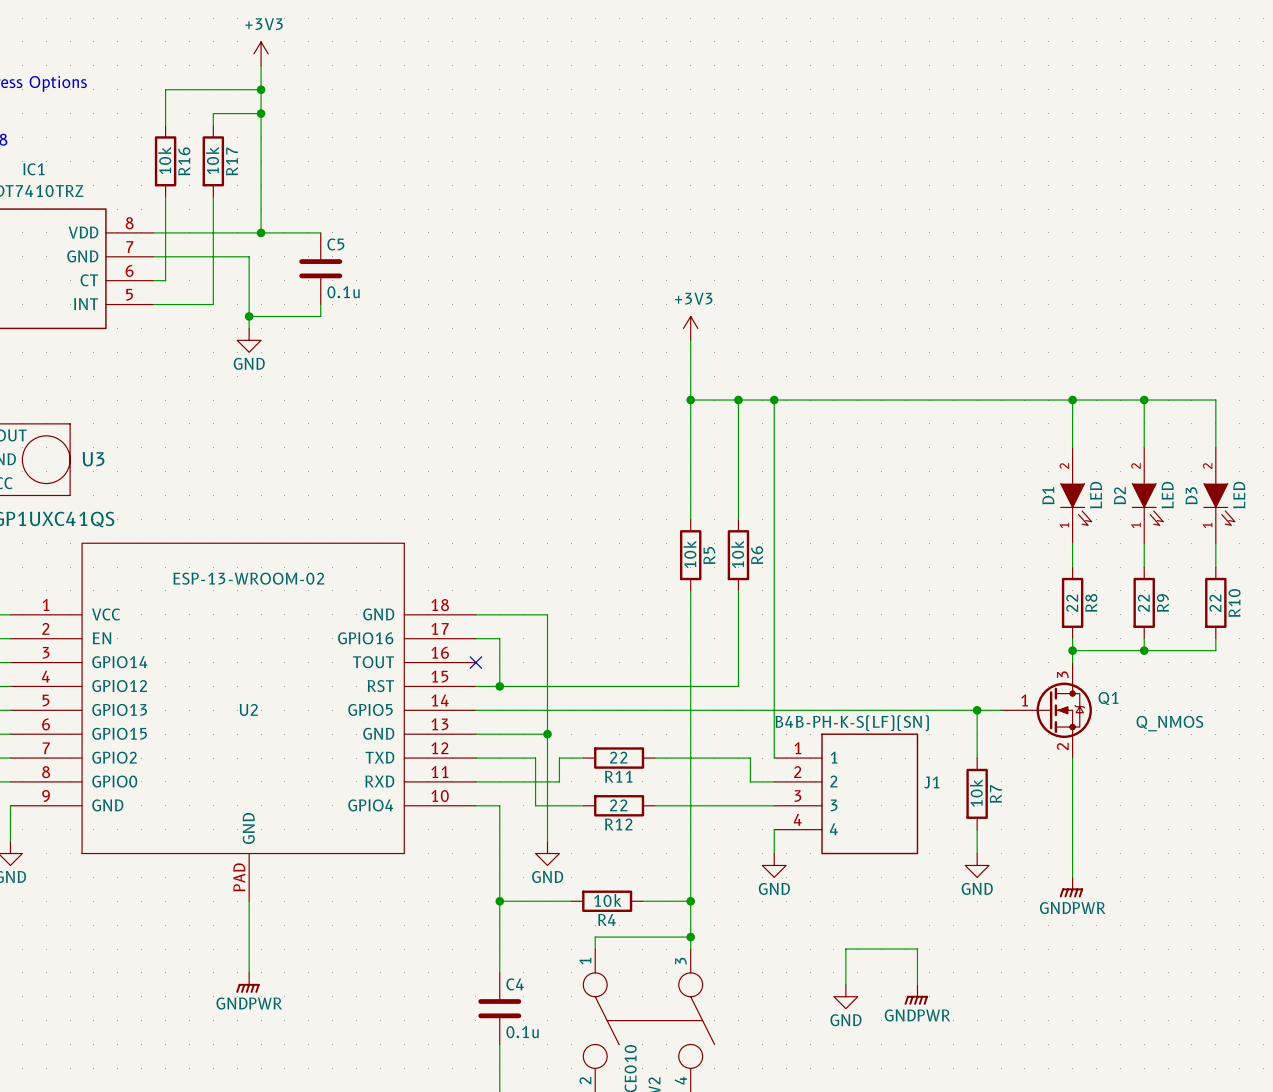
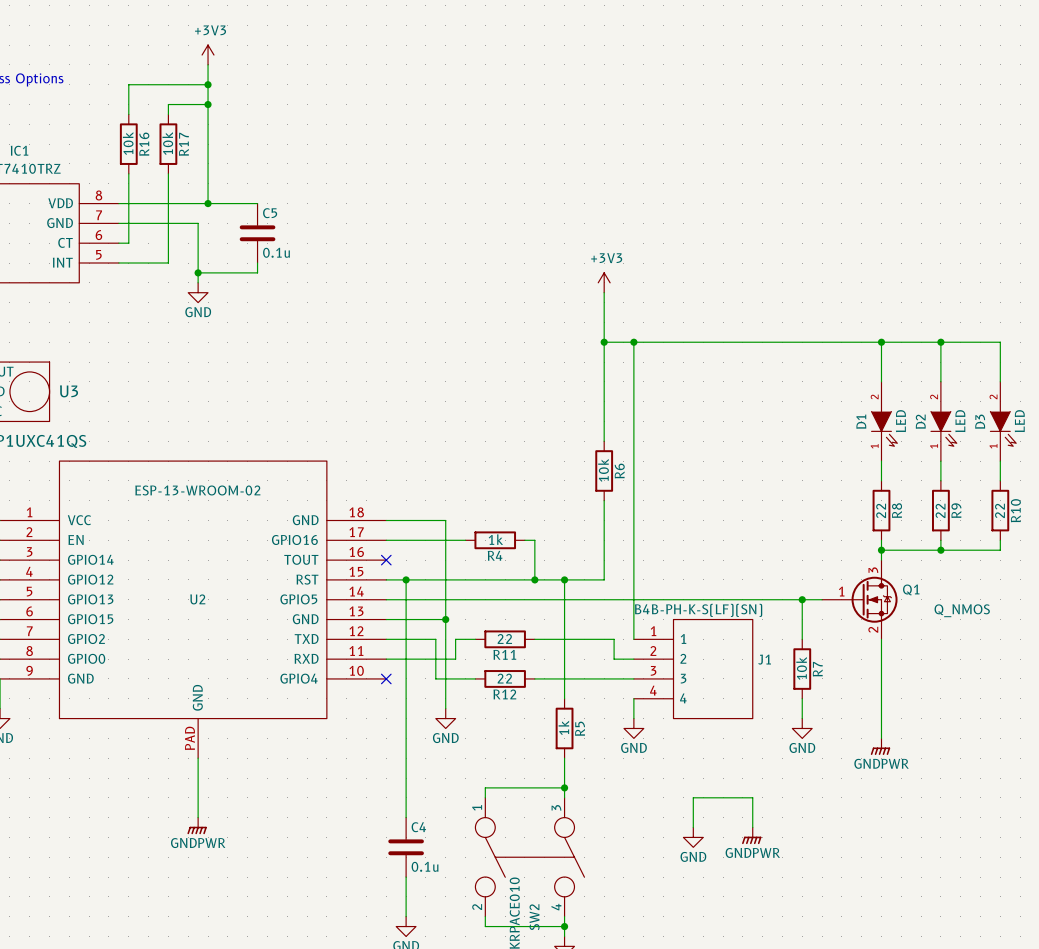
power symbol position: +3V3 (690, 328) -> +3V3 (604, 282)
wire: (690, 340) (690, 519) -> none
wire: (690, 400) (738, 400) -> (604, 292) (604, 342)
junction: (690, 400) -> none
R5 value: 10k (689, 554) -> 1k (563, 727)
R5 position: (690, 555) -> (564, 728)
wire: (690, 590) (690, 686) -> none
wire: (499, 638) (499, 686) -> (406, 540) (465, 540)
wire: none -> (524, 540) (534, 540) (534, 579)
junction: none -> (534, 579)
junction: none -> (564, 579)
wire: (475, 805) (499, 805) -> (406, 579) (406, 678)
no-connect mark: none -> (386, 678)
wire: (690, 829) (690, 901) (642, 901) -> none
R4 value: 10k (607, 900) -> 1k (495, 539)
wire: (499, 901) (571, 901) -> none
junction: (499, 901) -> none
R4 position: (607, 901) -> (495, 540)
junction: (690, 901) -> none

